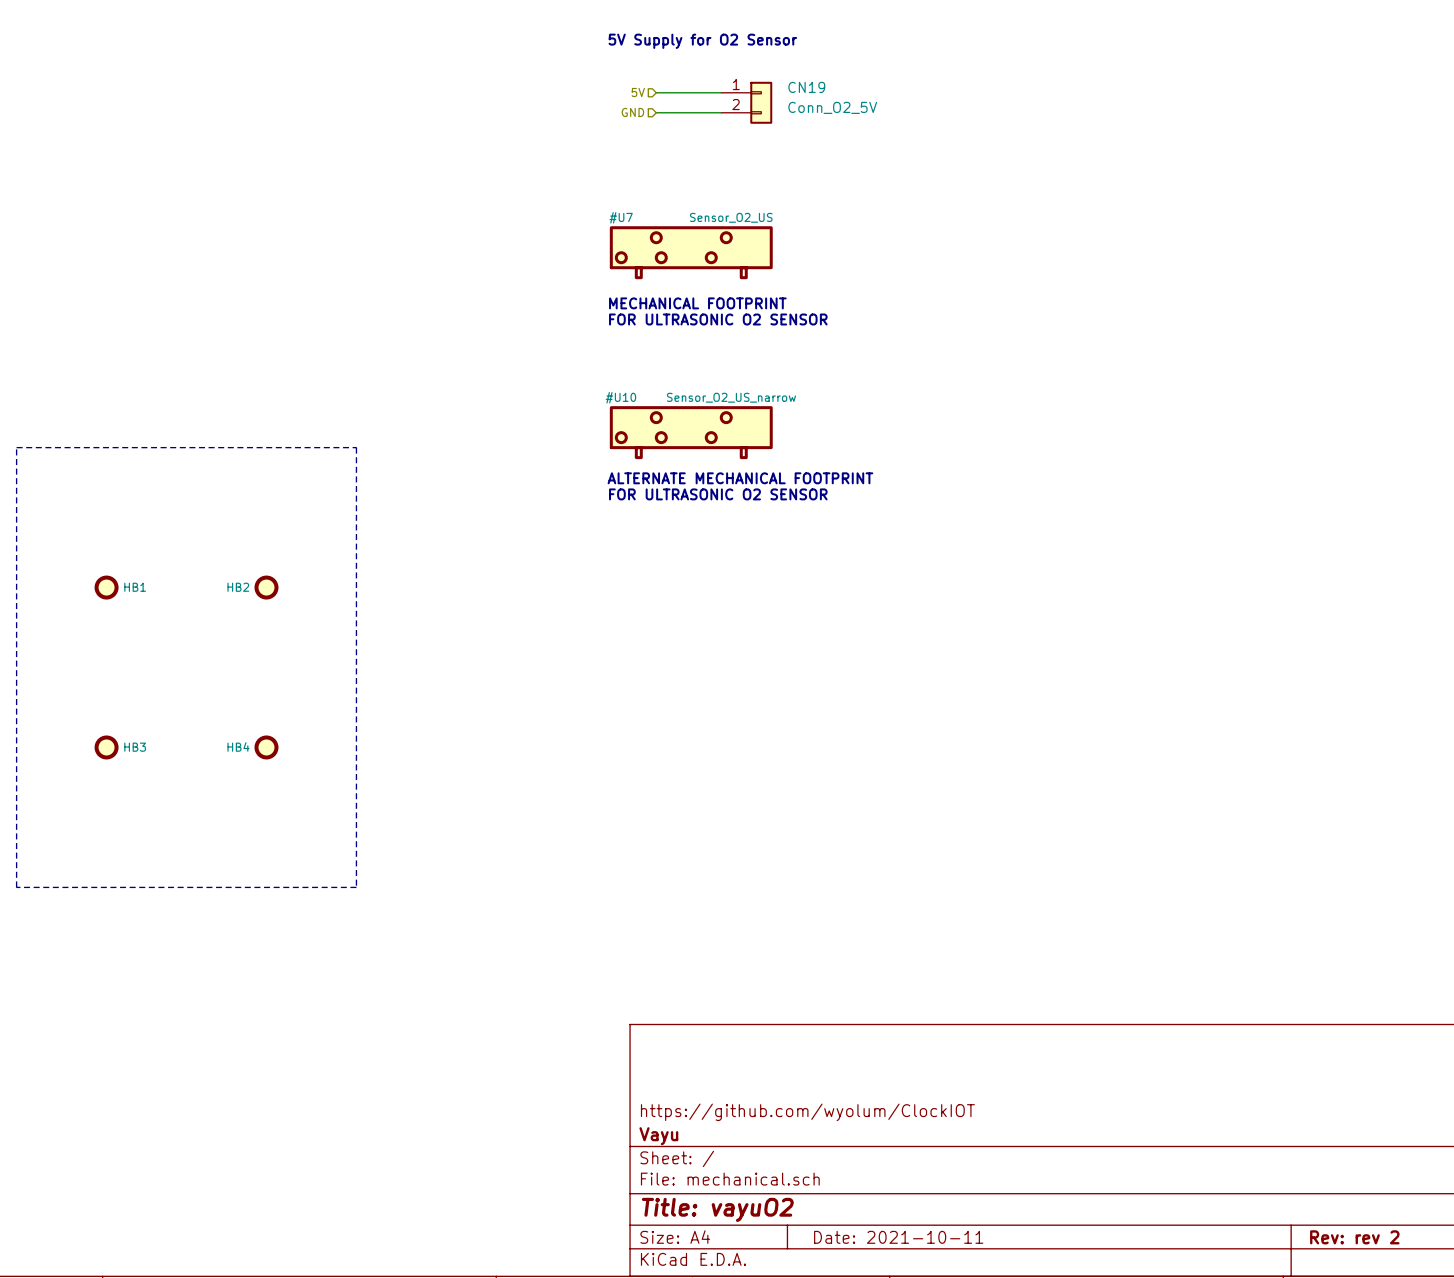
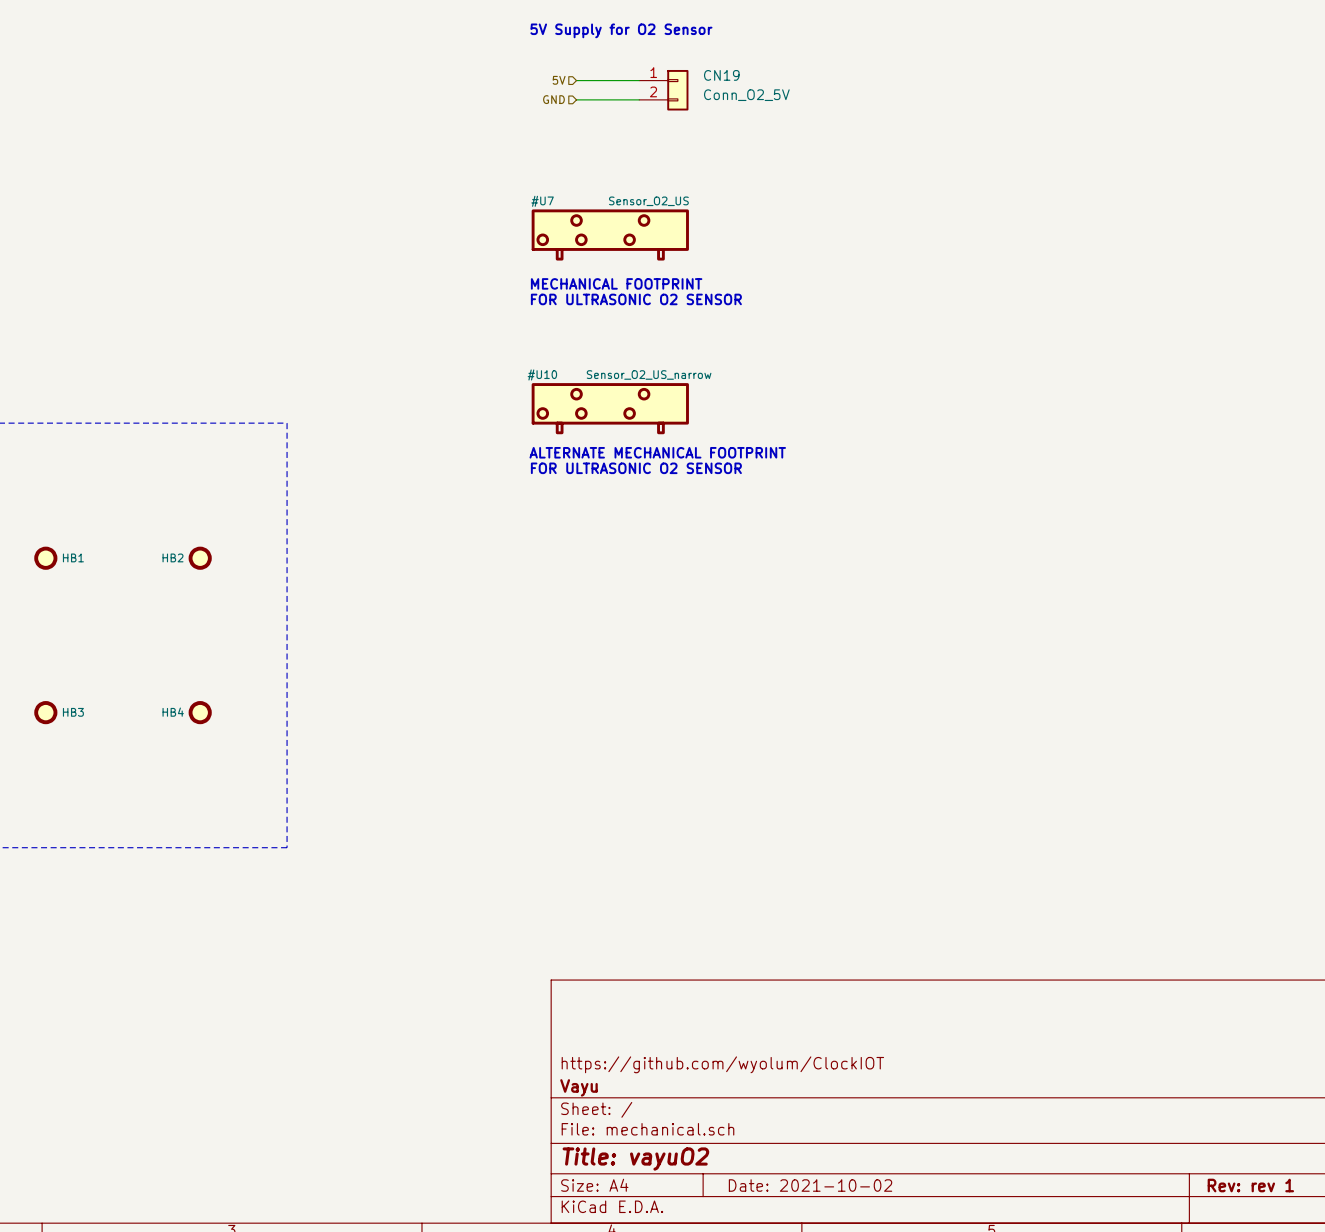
title block: Date: 2021-10-11 (898, 1237) -> Date: 2021-10-02 (810, 1185)
title block: Rev: rev 2 (1354, 1237) -> Rev: rev 1 (1250, 1185)

